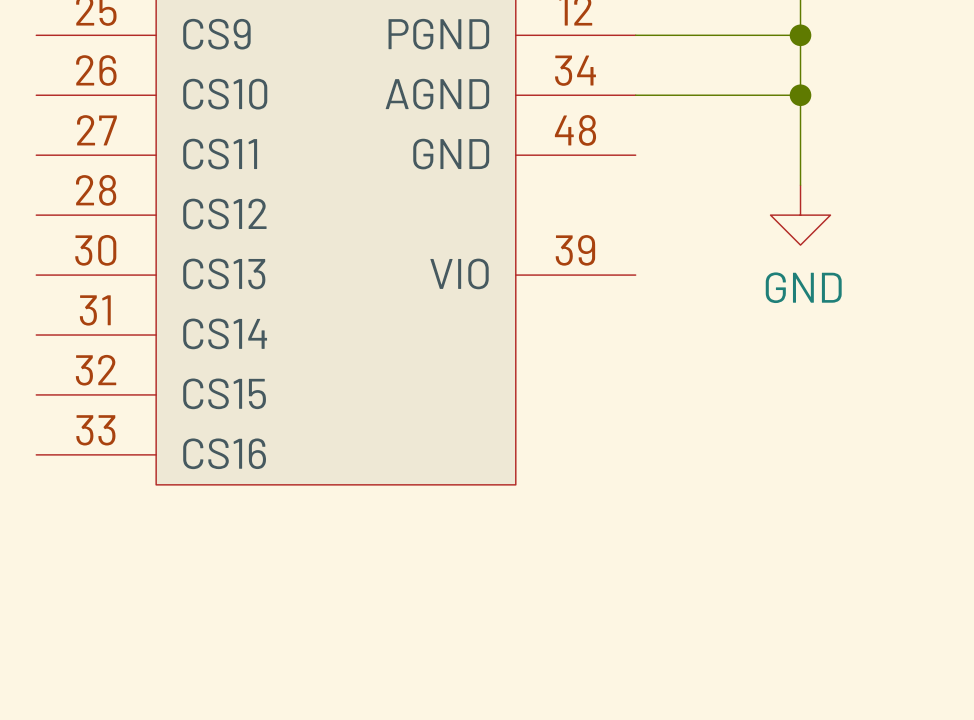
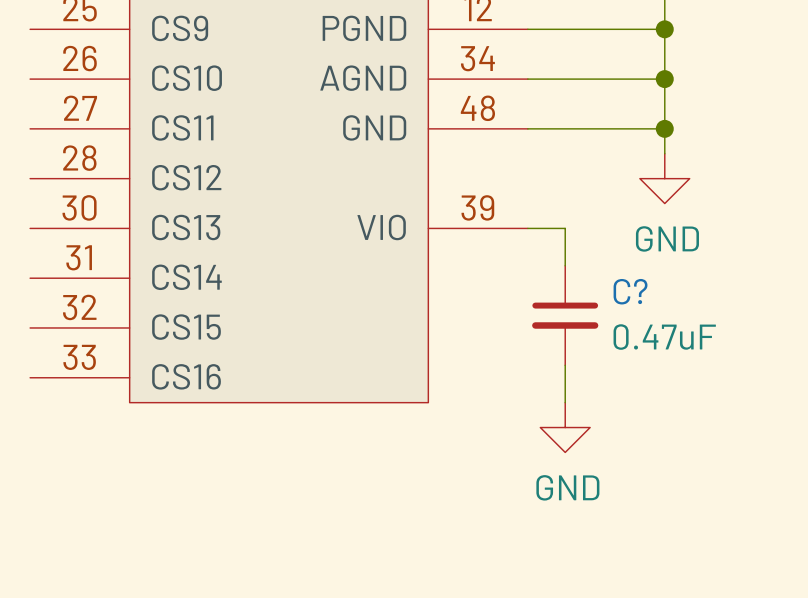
wire: none -> (527, 128) (664, 128)
junction: none -> (664, 128)
wire: none -> (527, 228) (565, 228) (565, 265)
C?: none -> 0.47uF (565, 315)
wire: none -> (565, 365) (565, 402)
power symbol: none -> GND (565, 427)

